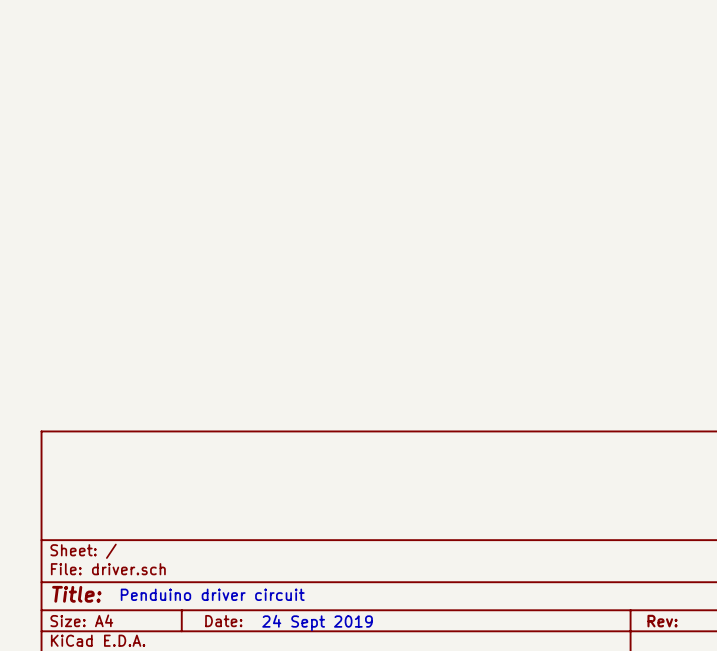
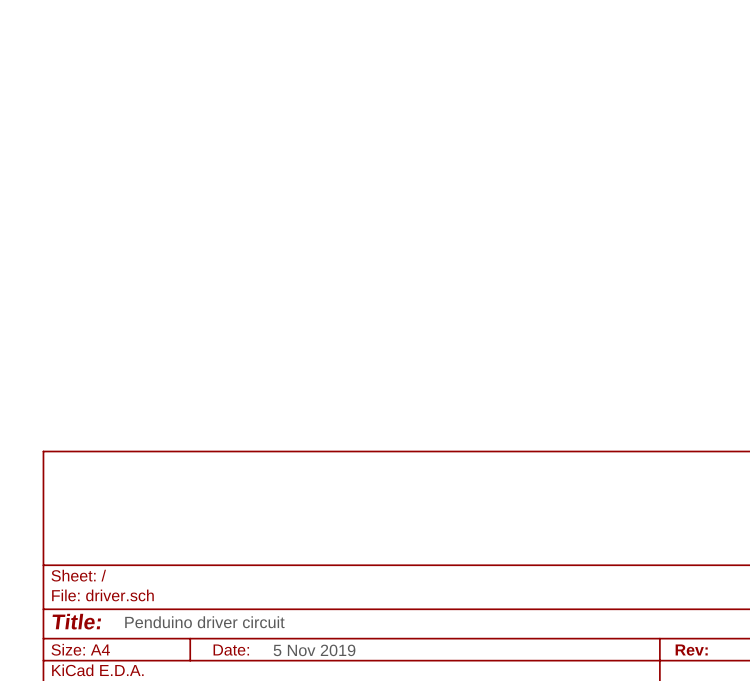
text: 24 Sept 2019 (317, 623) -> 5 Nov 2019 (314, 650)

